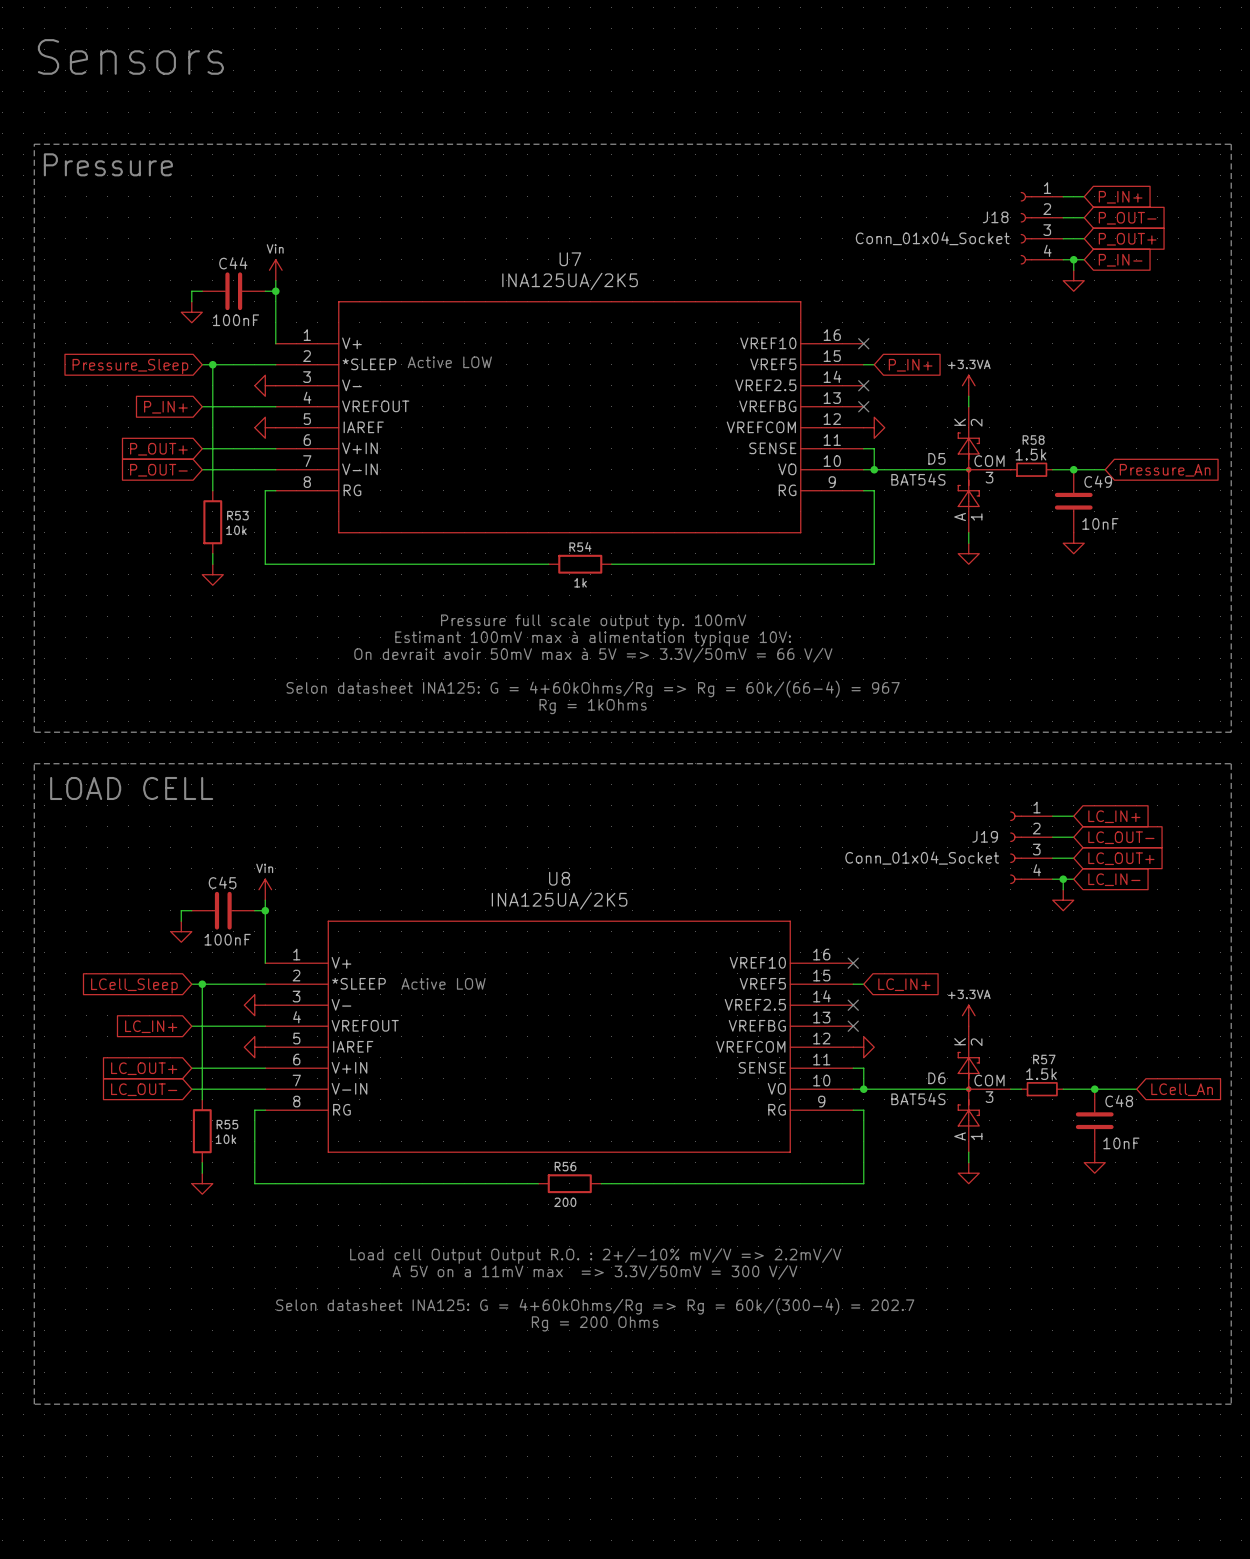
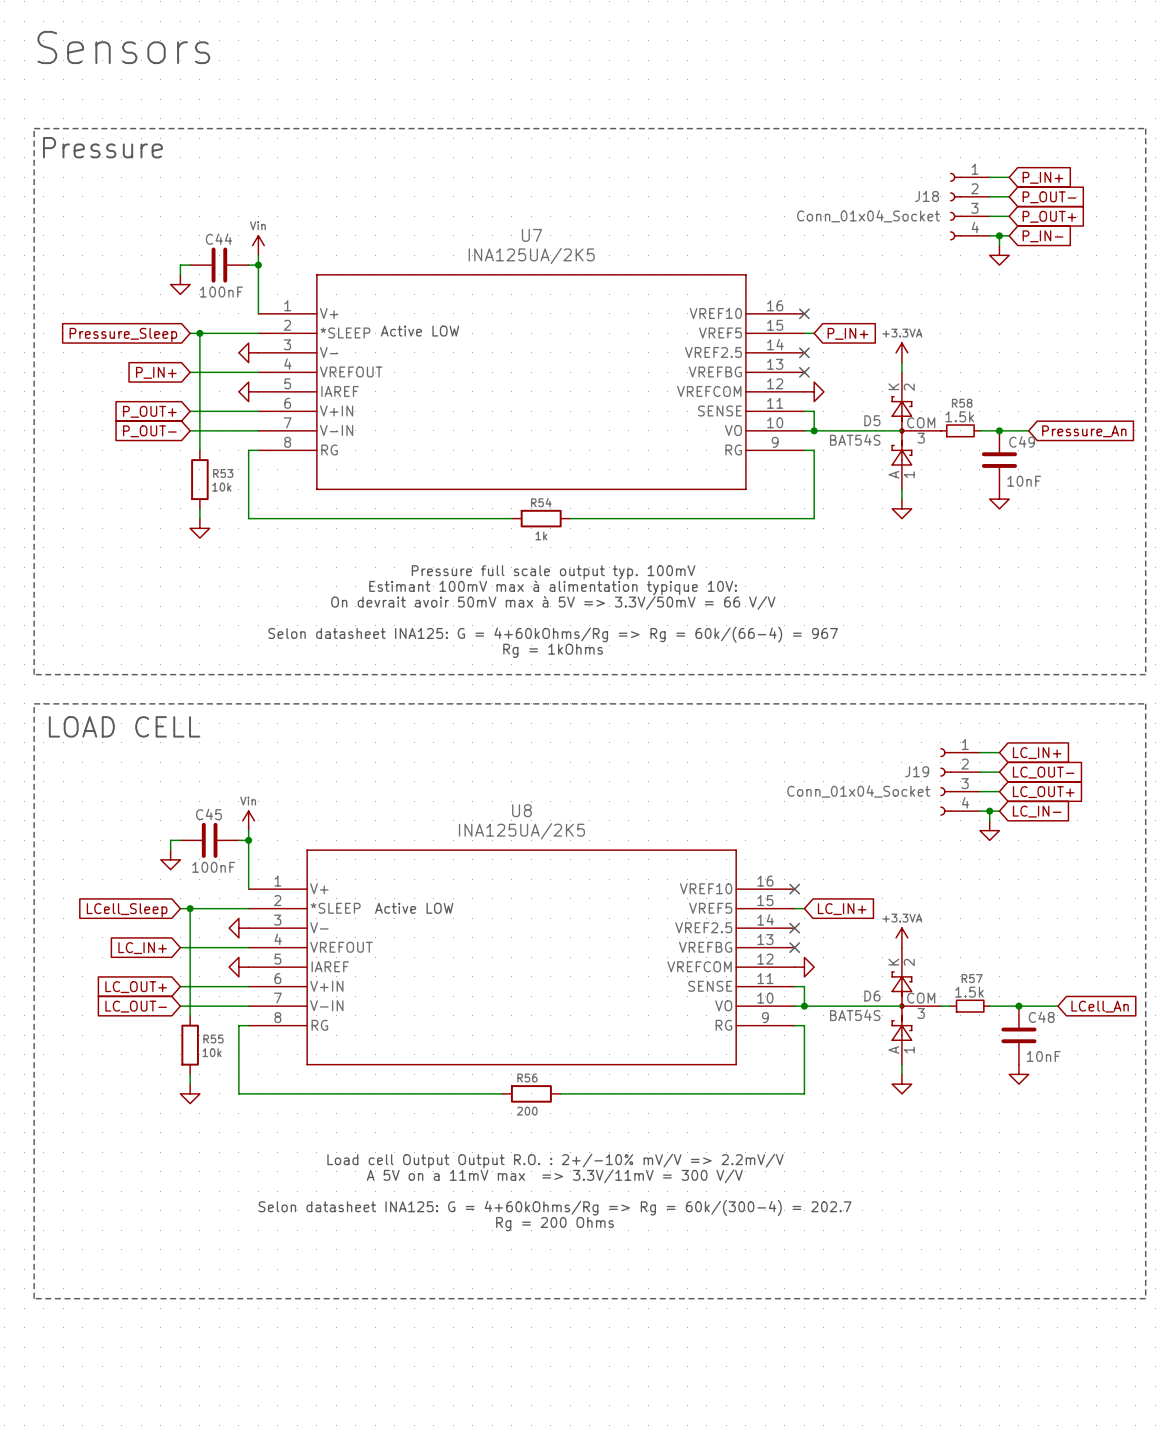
text: A 5V on a 11mV max => 3.3V/50mV = 300 V/V (594, 1272) -> A 5V on a 11mV max => 3.3V/11mV = 300 V/V (554, 1176)

